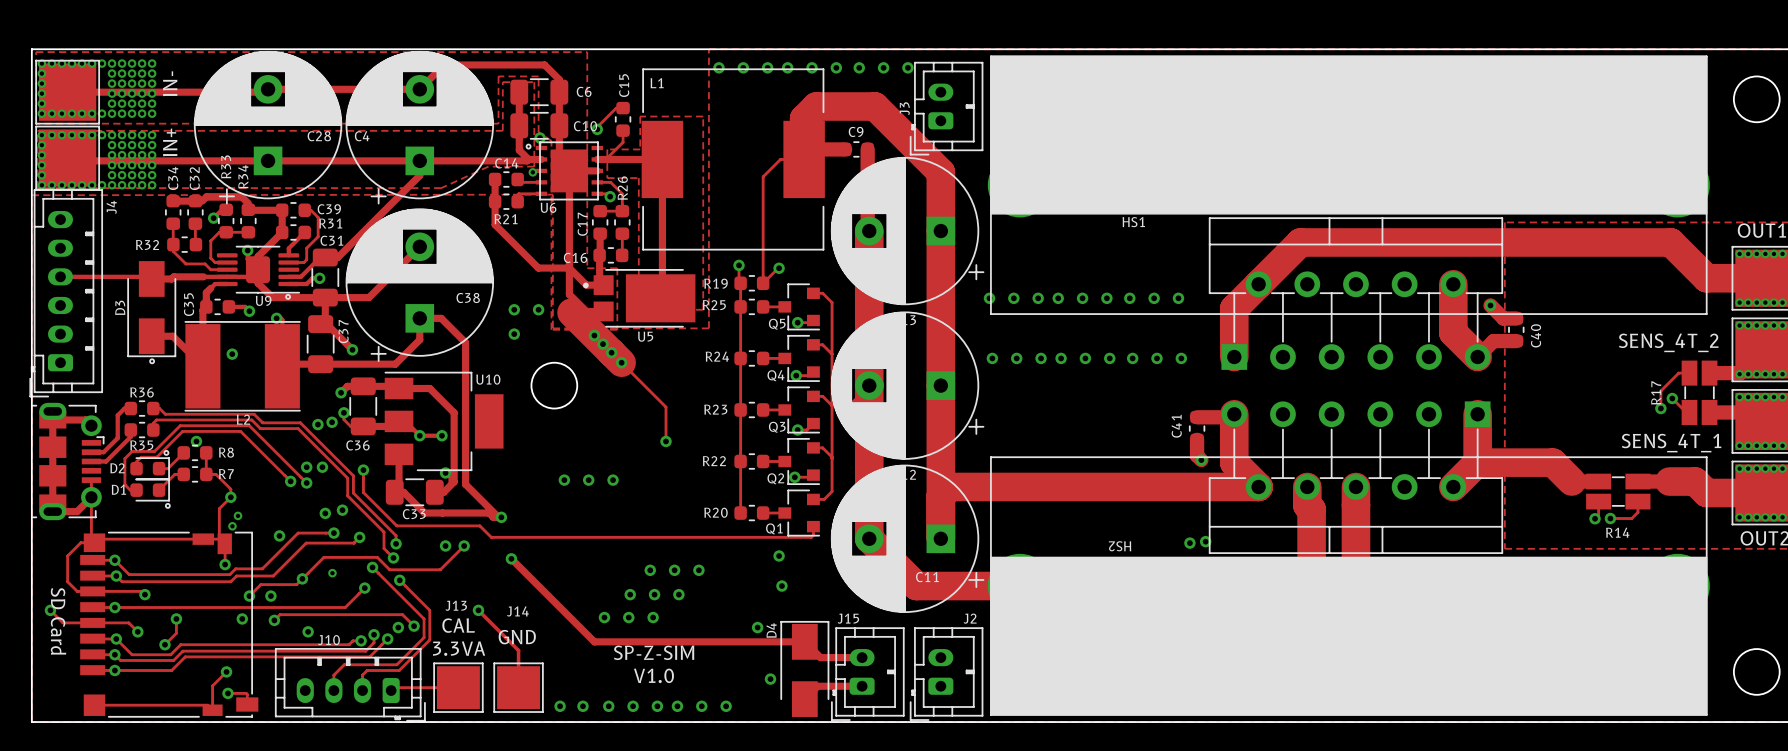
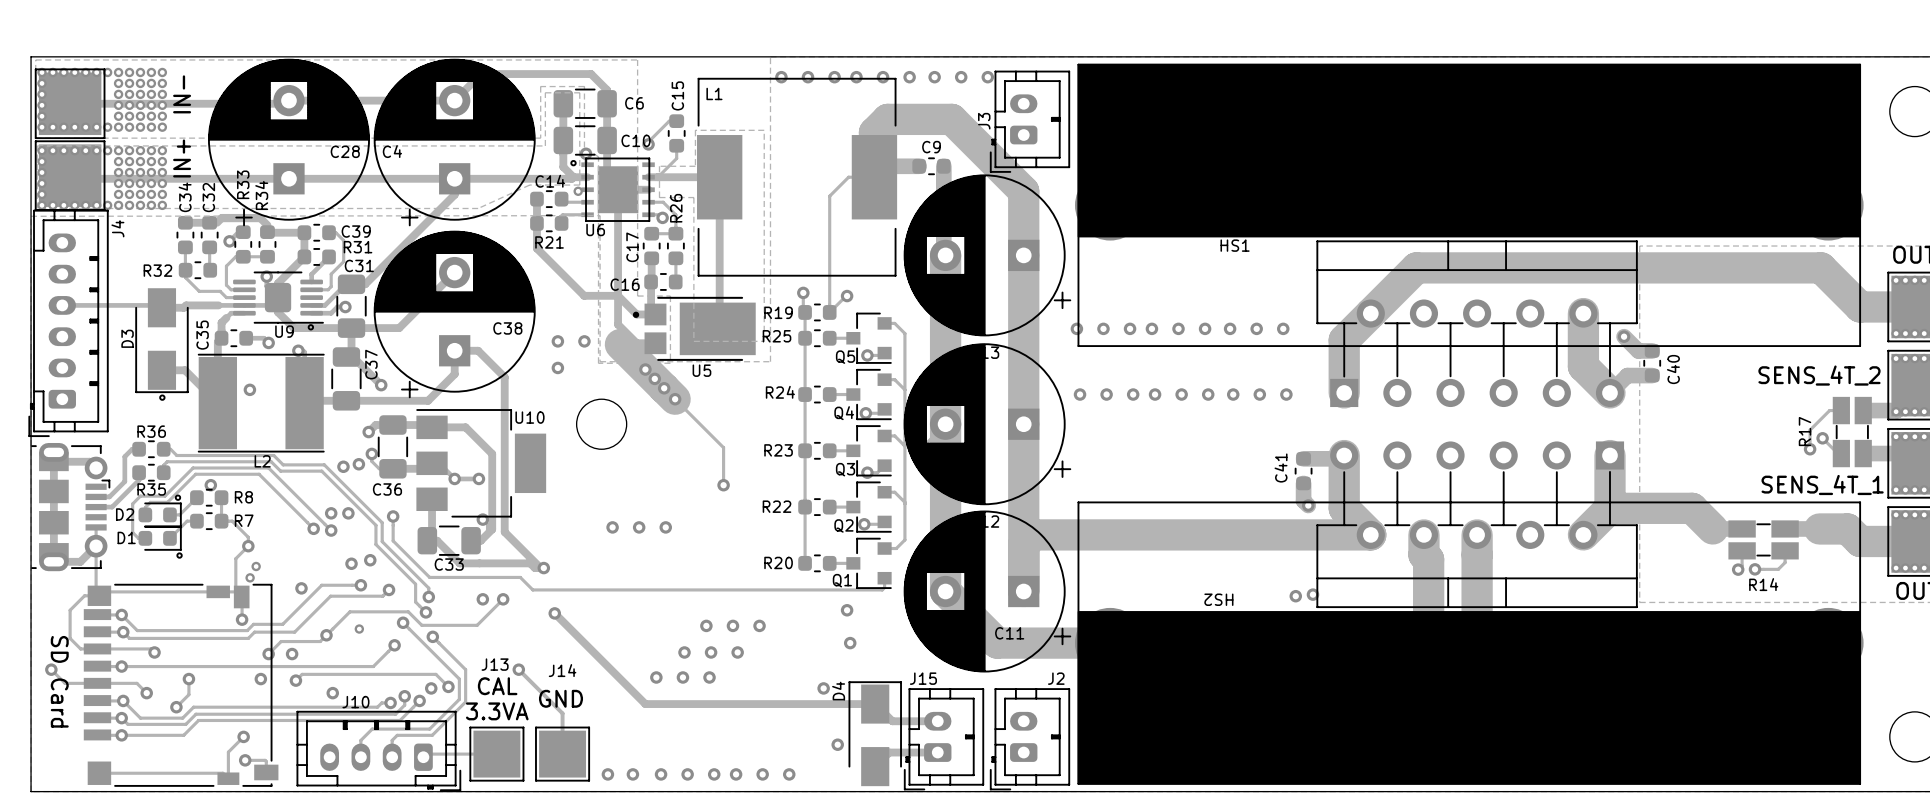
text: SP-Z-SIM (654, 652) -> none
text: V1.0 (653, 675) -> none

